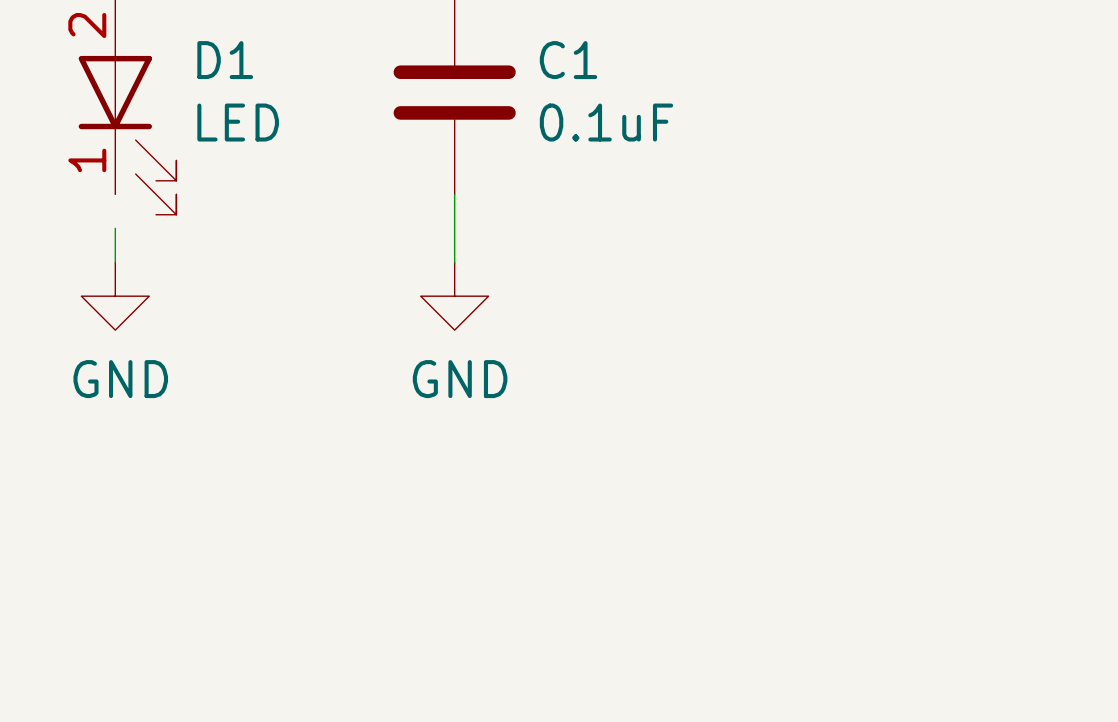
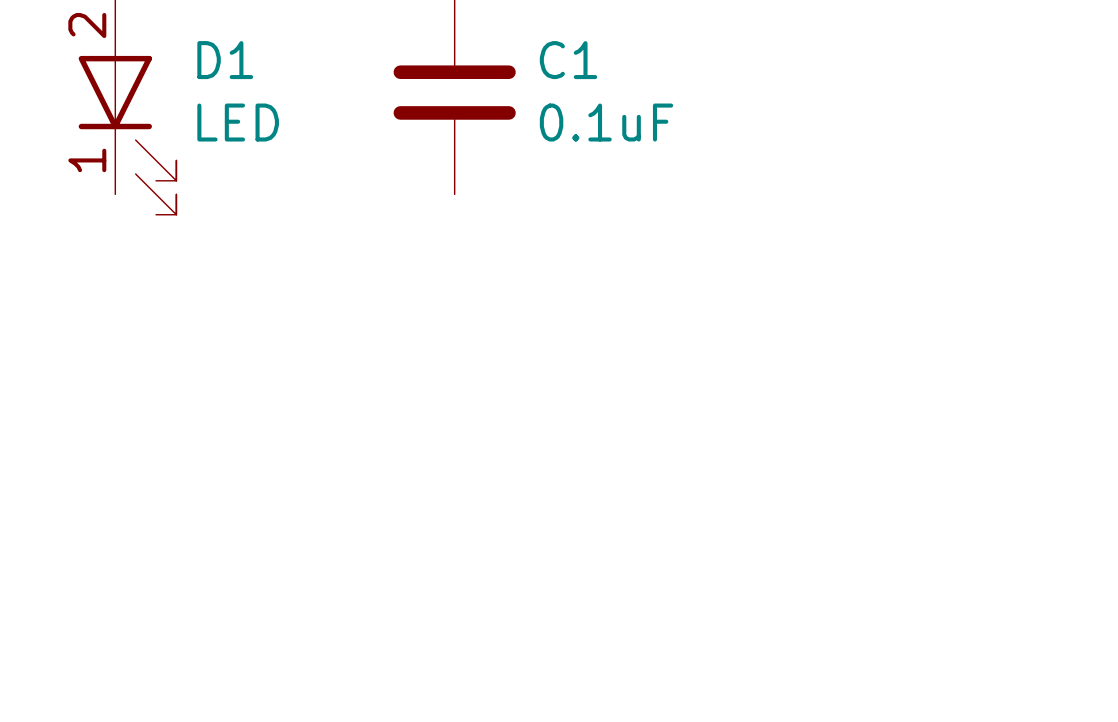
wire: (454, 194) (454, 262) -> none
wire: (115, 228) (115, 262) -> none
power symbol: GND (115, 296) -> none
power symbol: GND (454, 296) -> none

